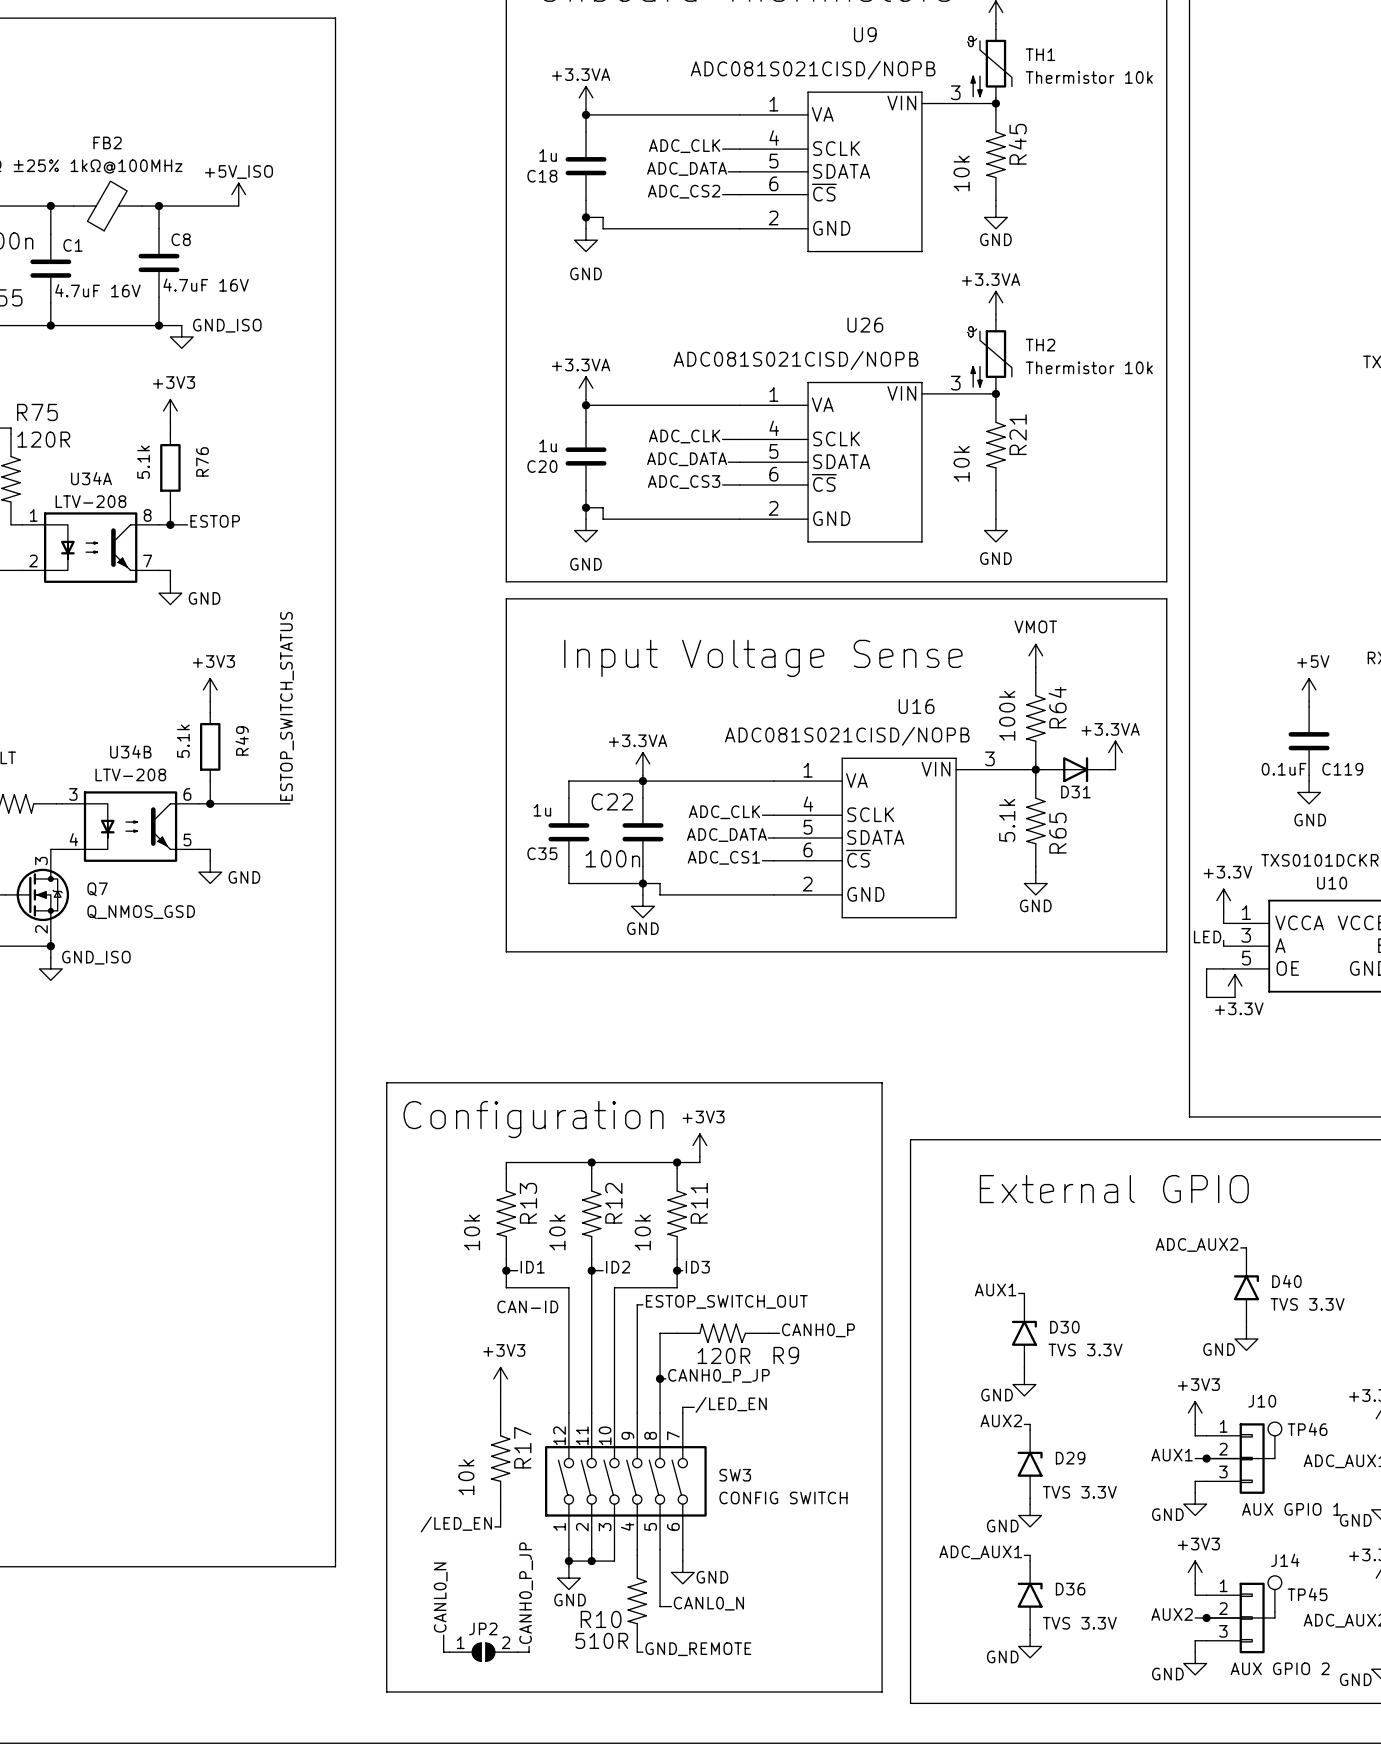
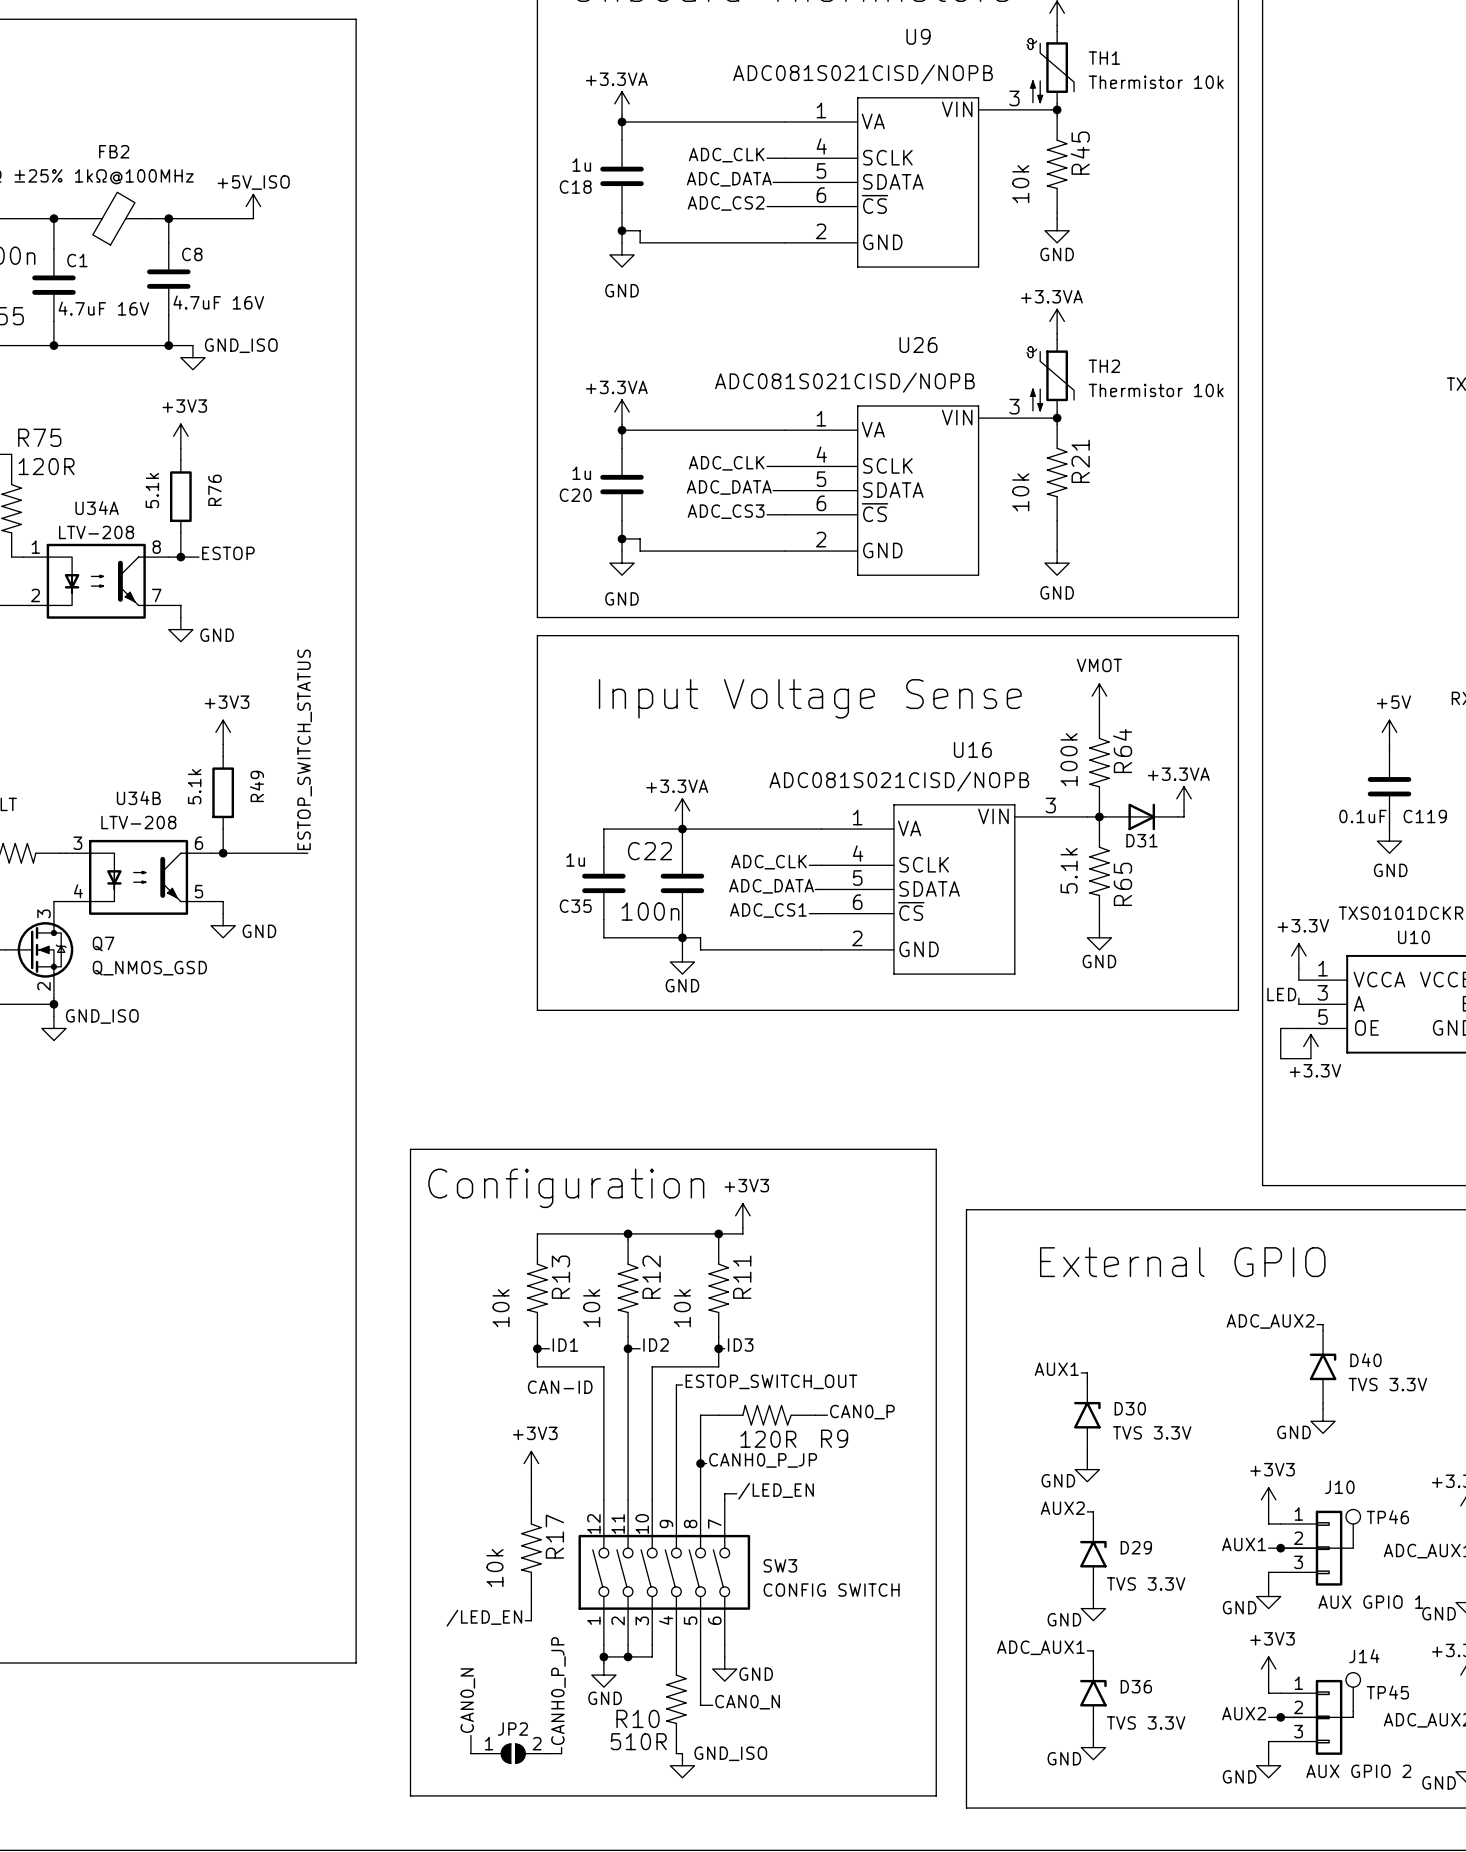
label: CANH0_P (818, 1330) -> CAN0_P (862, 1412)
label: CANL0_N (440, 1597) -> CAN0_N (467, 1700)
label: CANL0_N (708, 1603) -> CAN0_N (747, 1702)
label: GND_REMOTE (698, 1649) -> none
power symbol: none -> GND_ISO (682, 1765)

